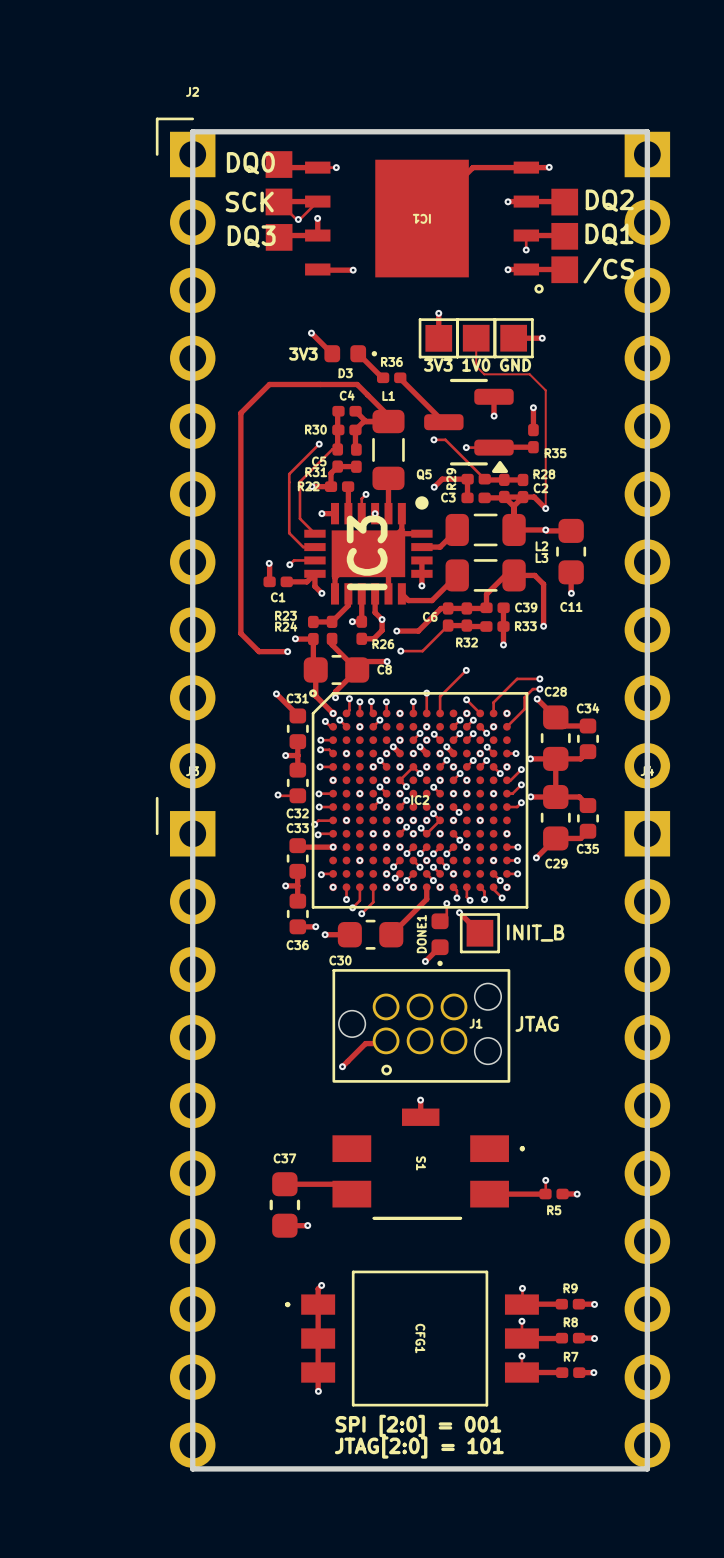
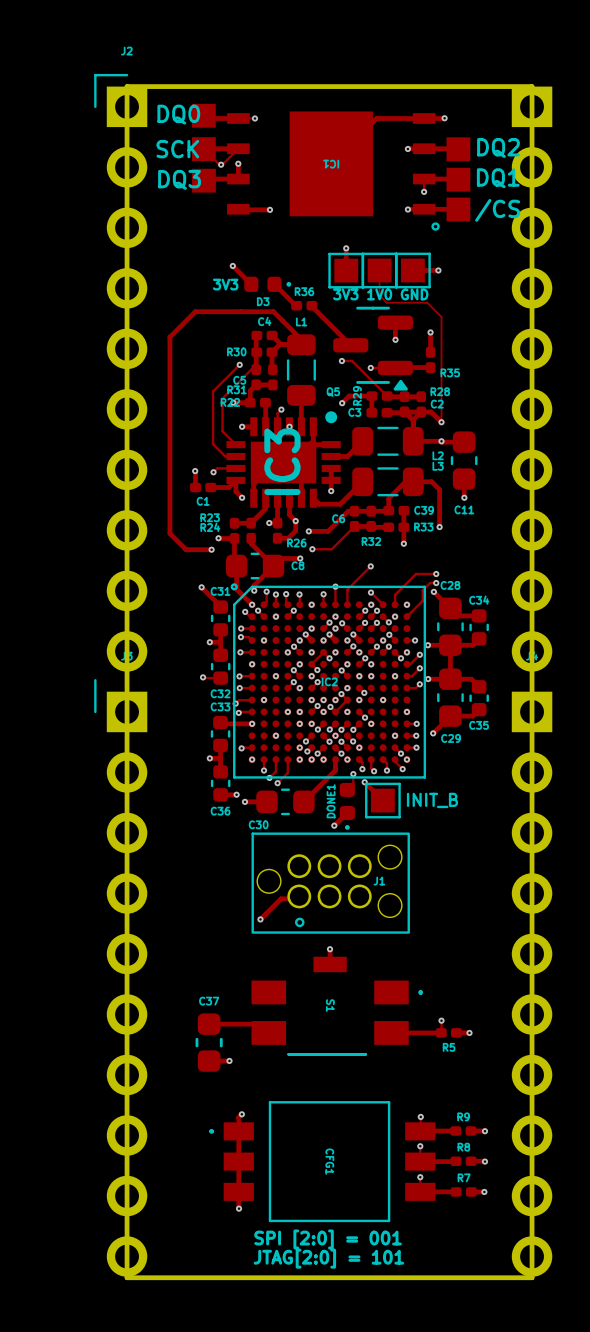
text: JTAG (537, 1023) -> none

